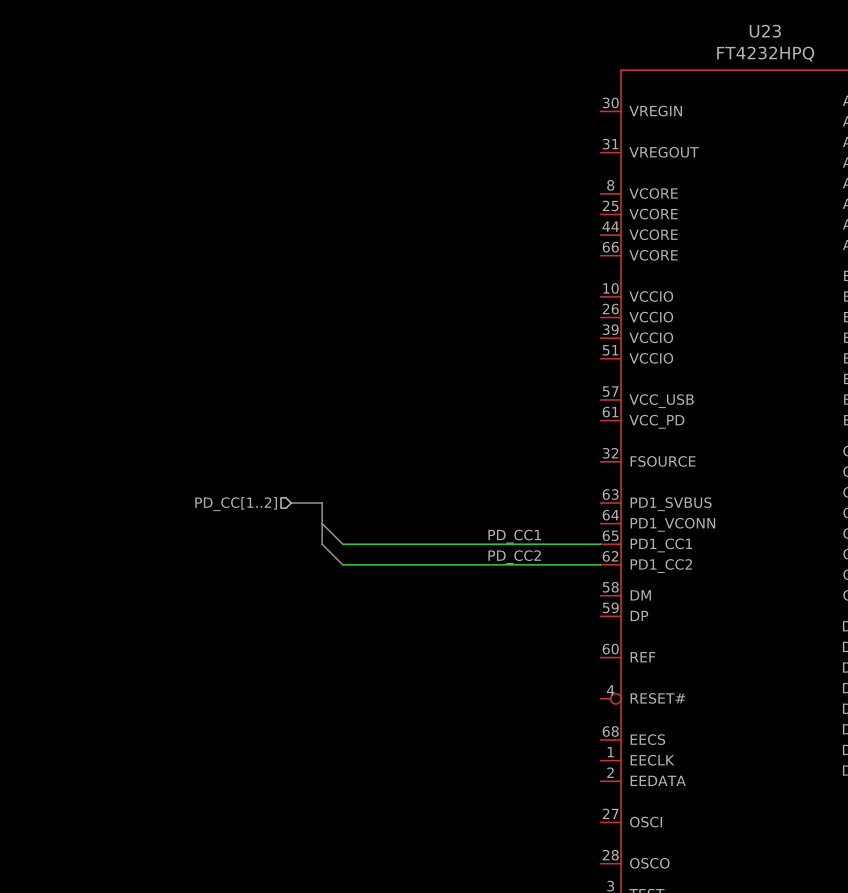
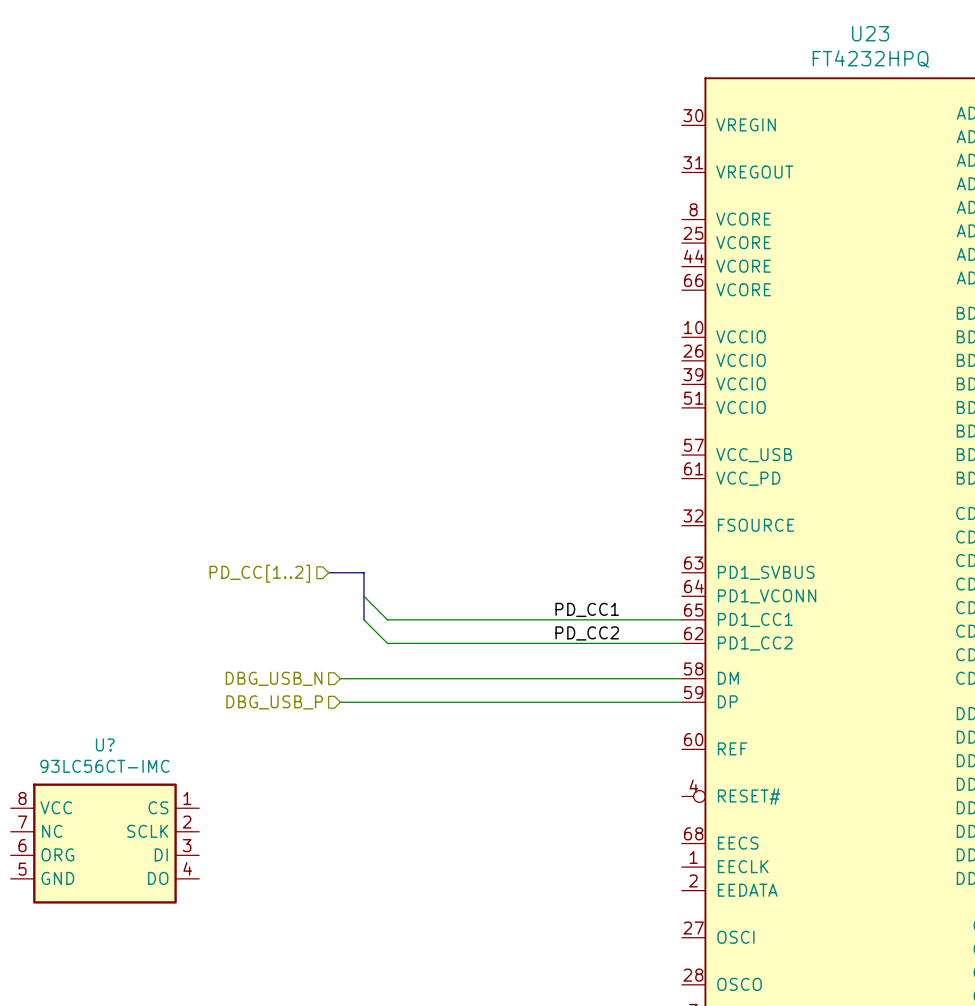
bus: (322, 523) (342, 544) -> none
bus: (322, 544) (342, 564) -> none
wire: none -> (340, 678) (681, 678)
hierarchical label: none -> DBG_USB_N (274, 678)
wire: none -> (340, 702) (681, 702)
hierarchical label: none -> DBG_USB_P (274, 702)
U?: none -> 93LC56CT-IMC (104, 843)

